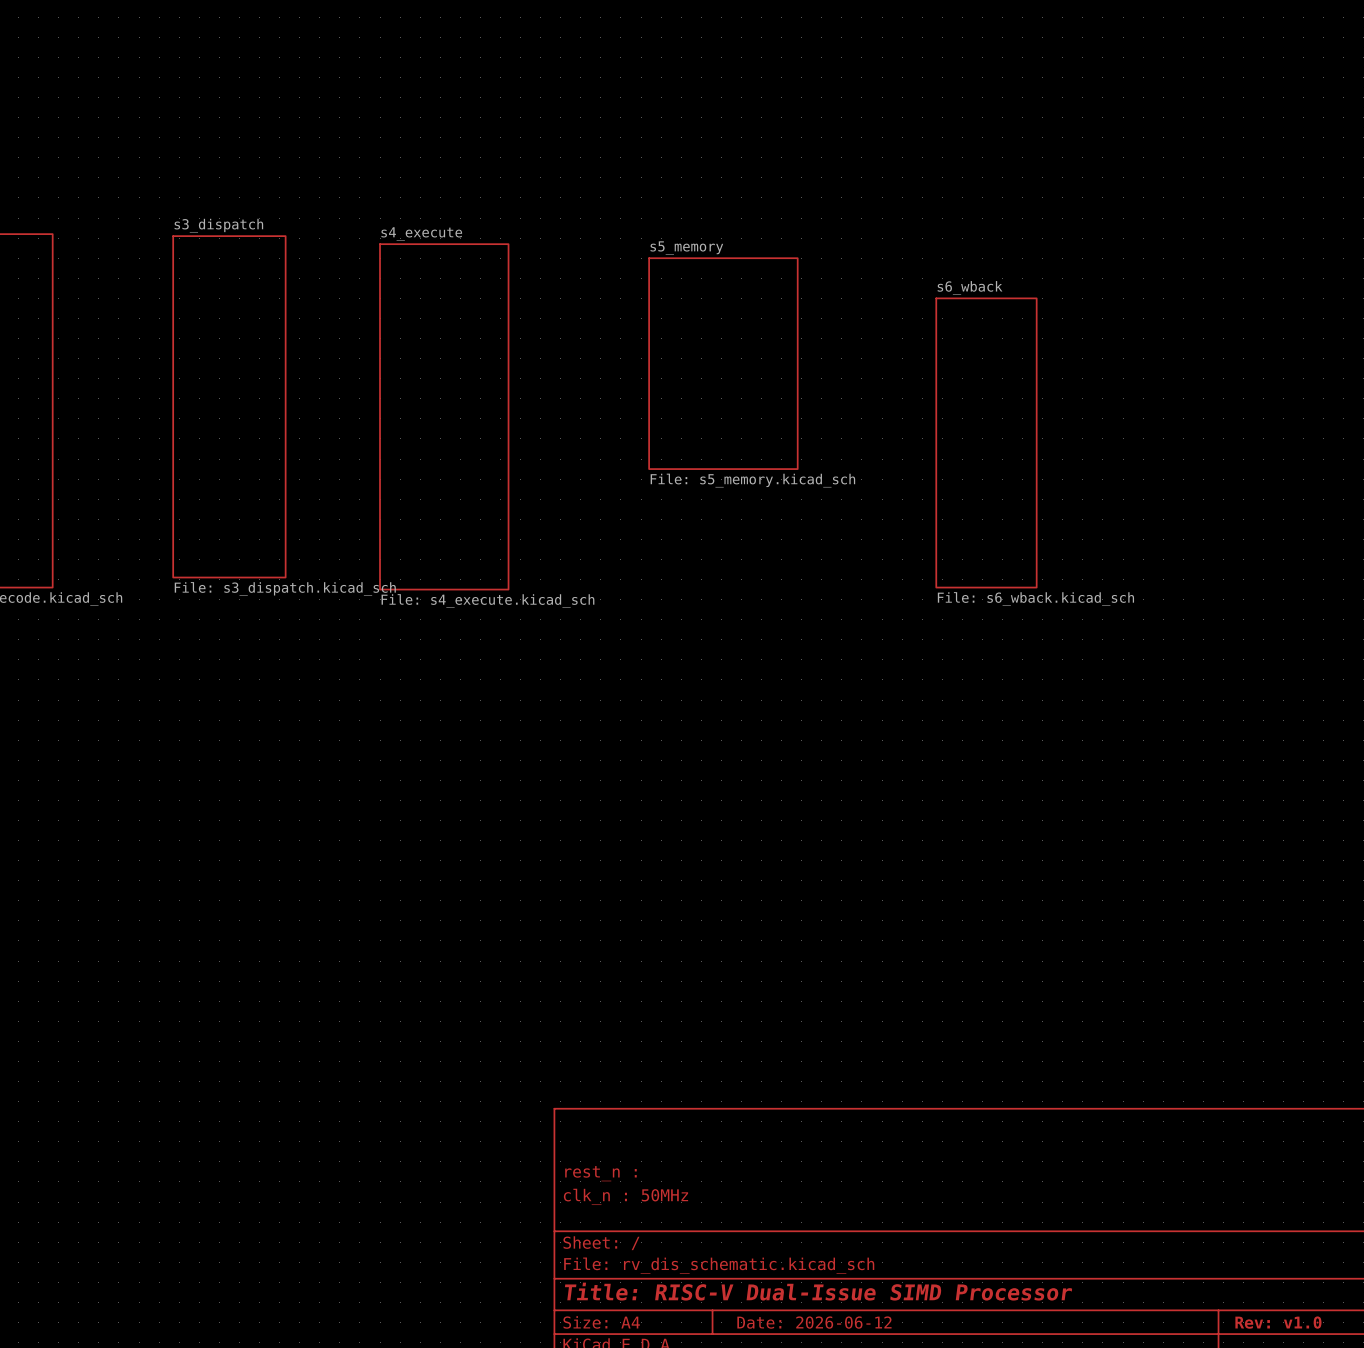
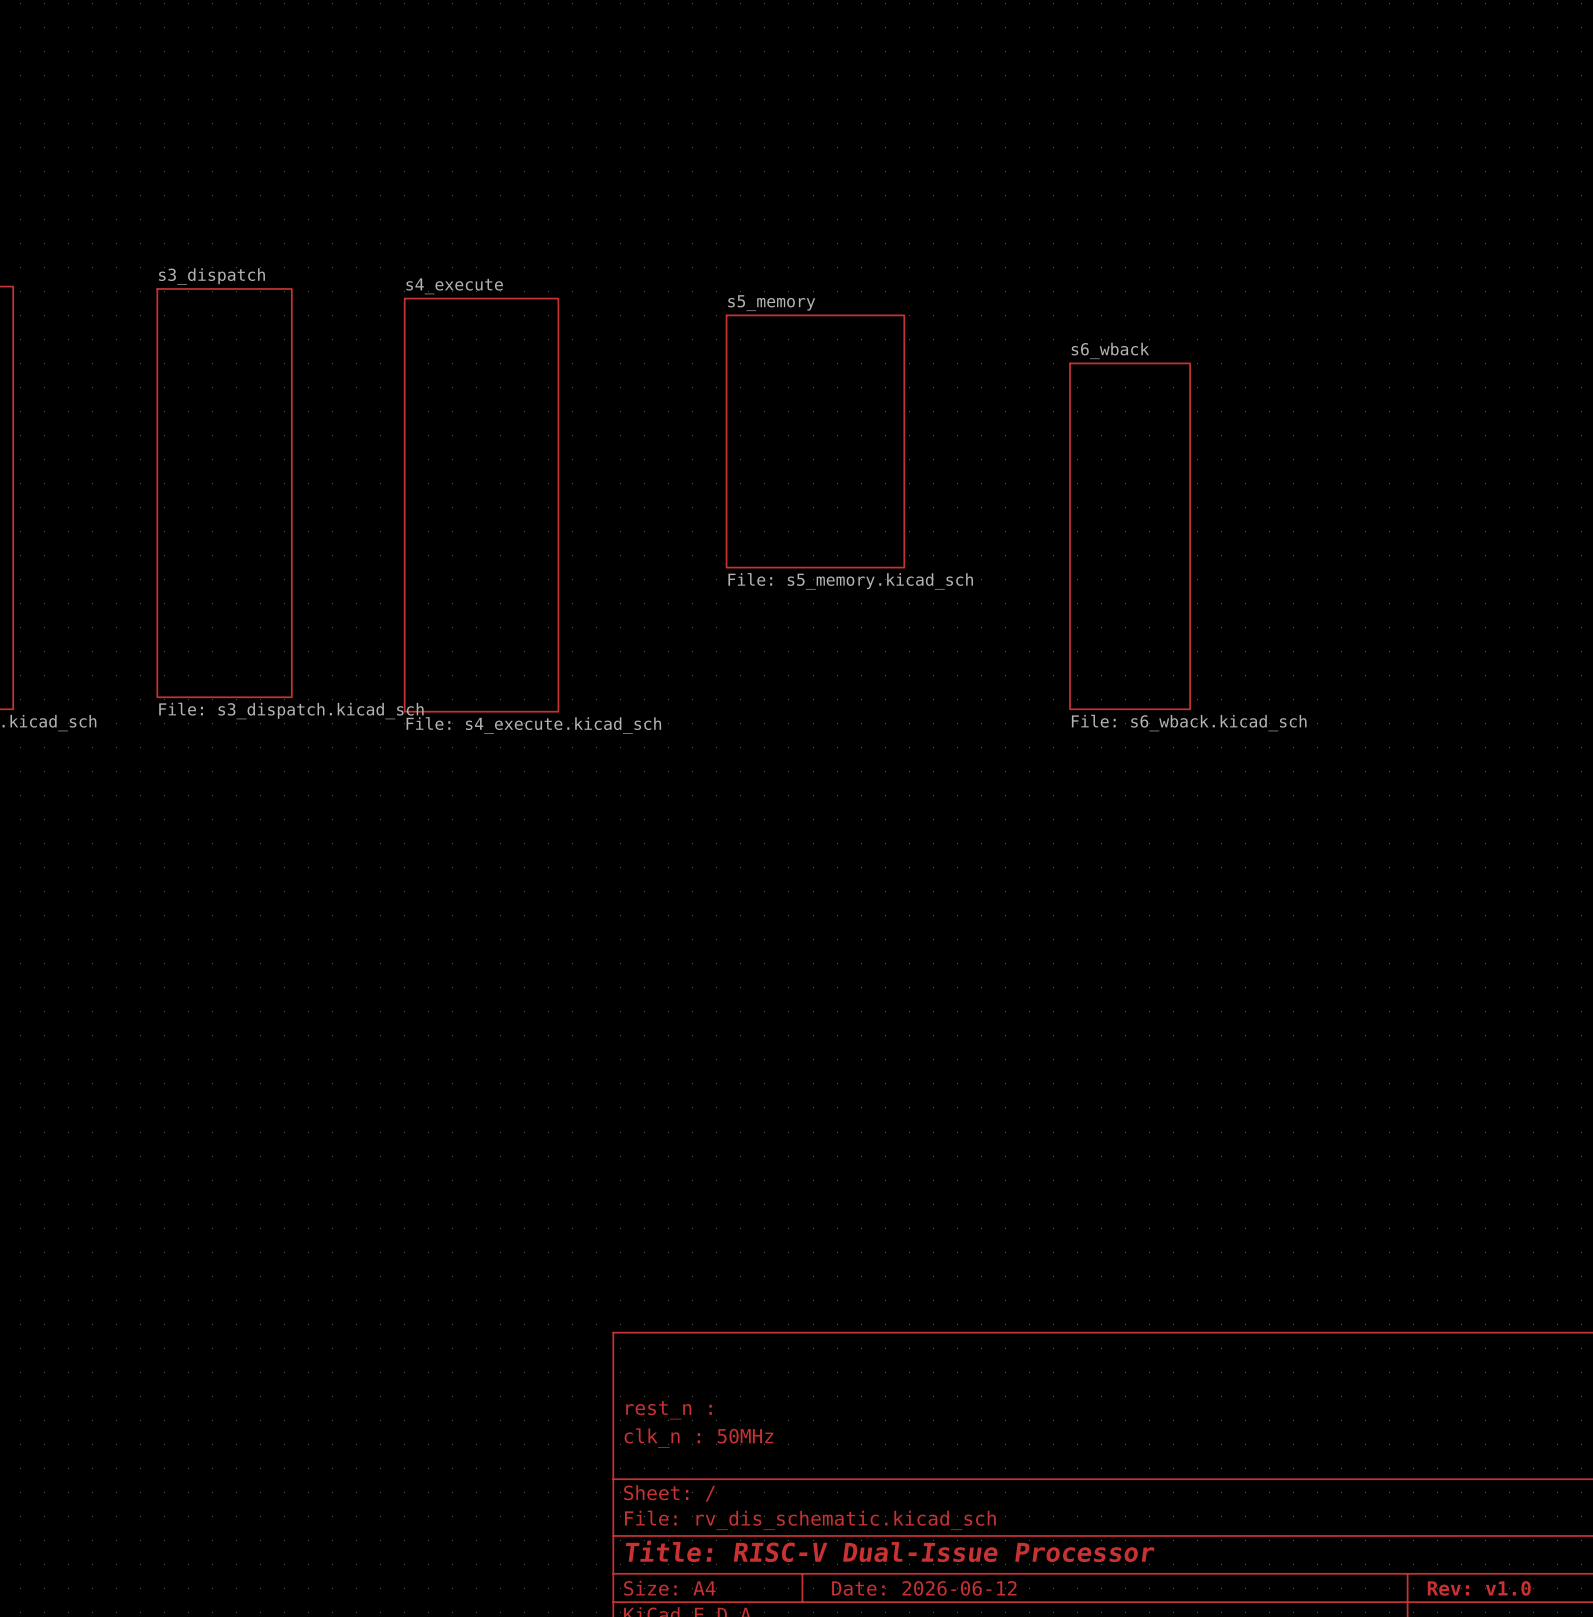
title block: Title: RISC-V Dual-Issue SIMD Processor (818, 1291) -> Title: RISC-V Dual-Issue Processor (890, 1551)

